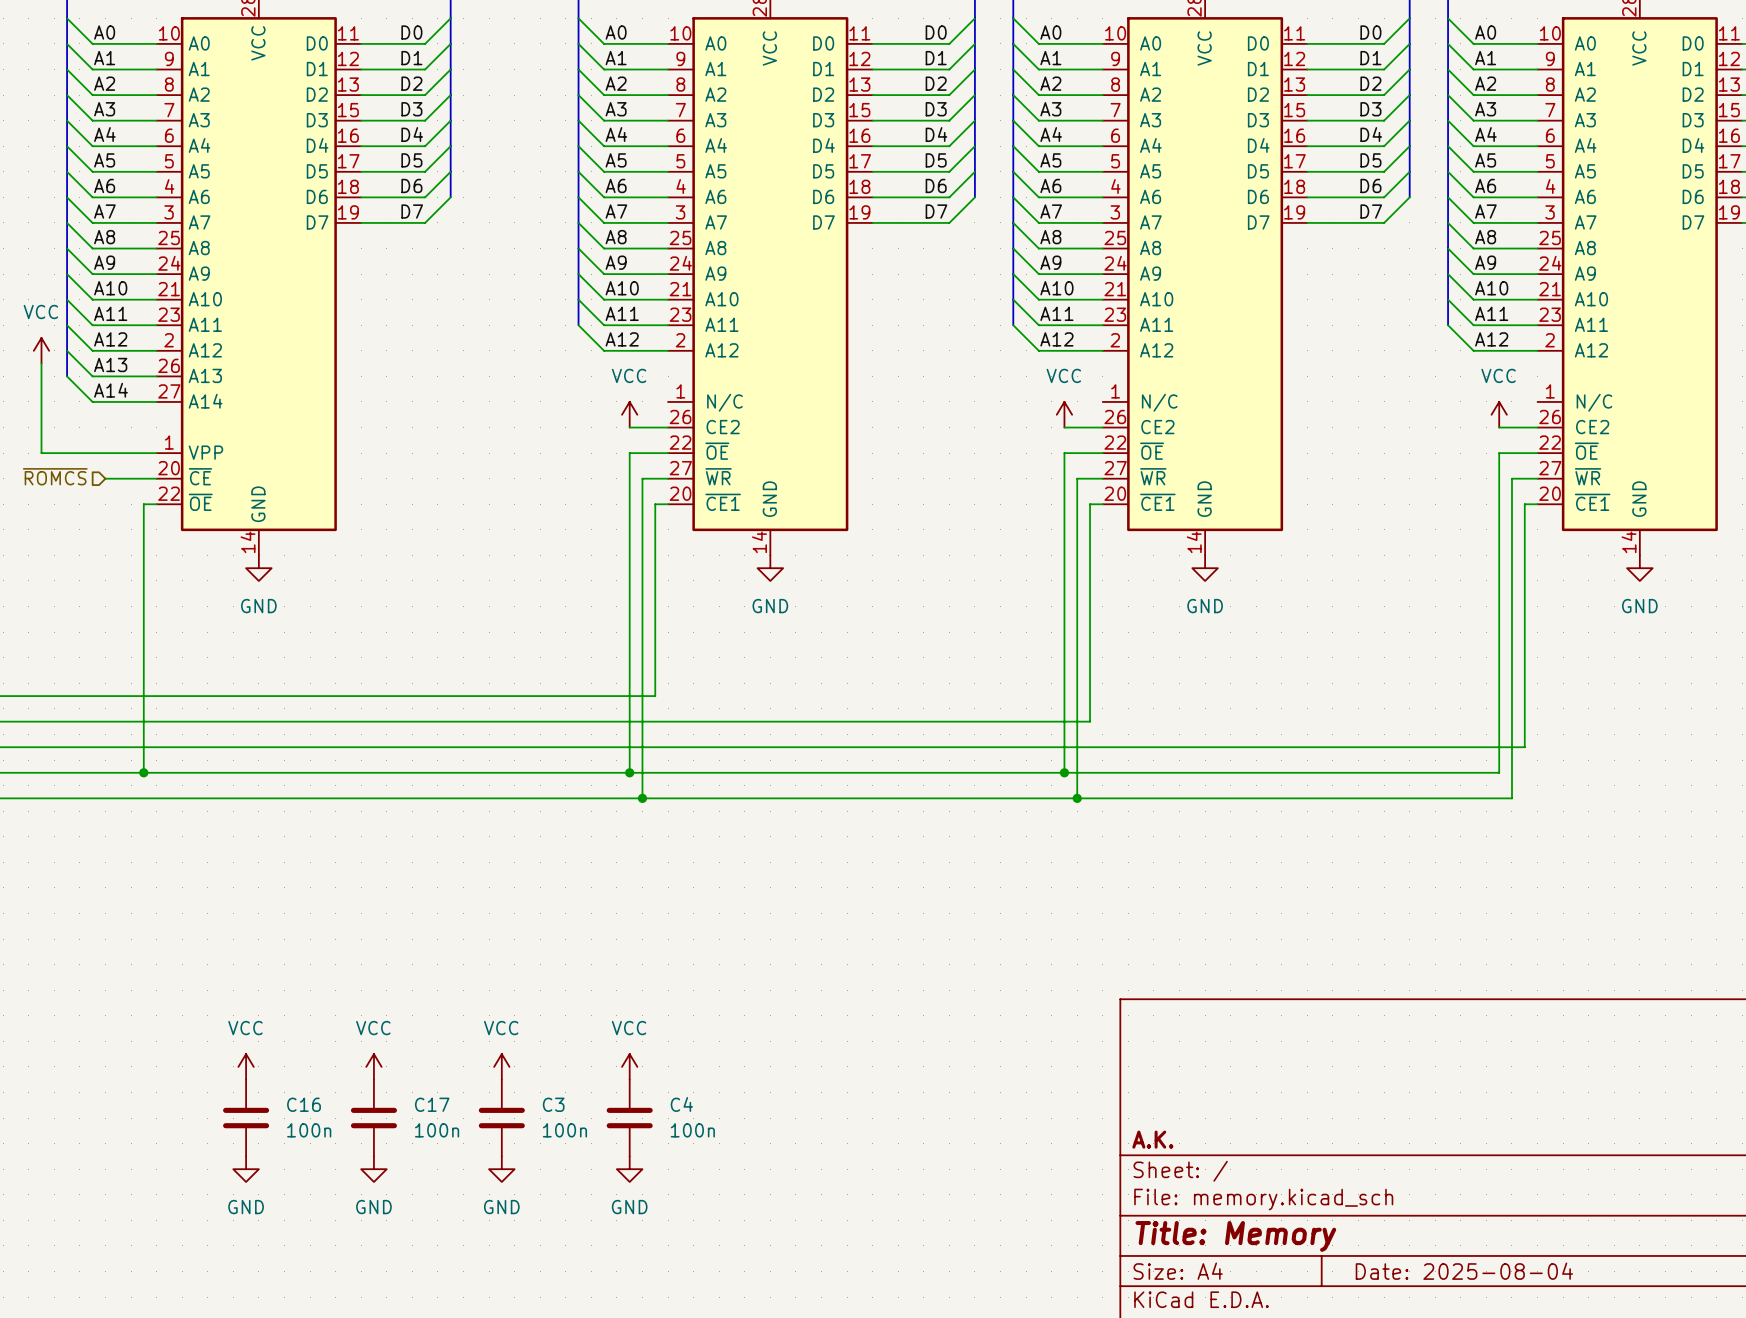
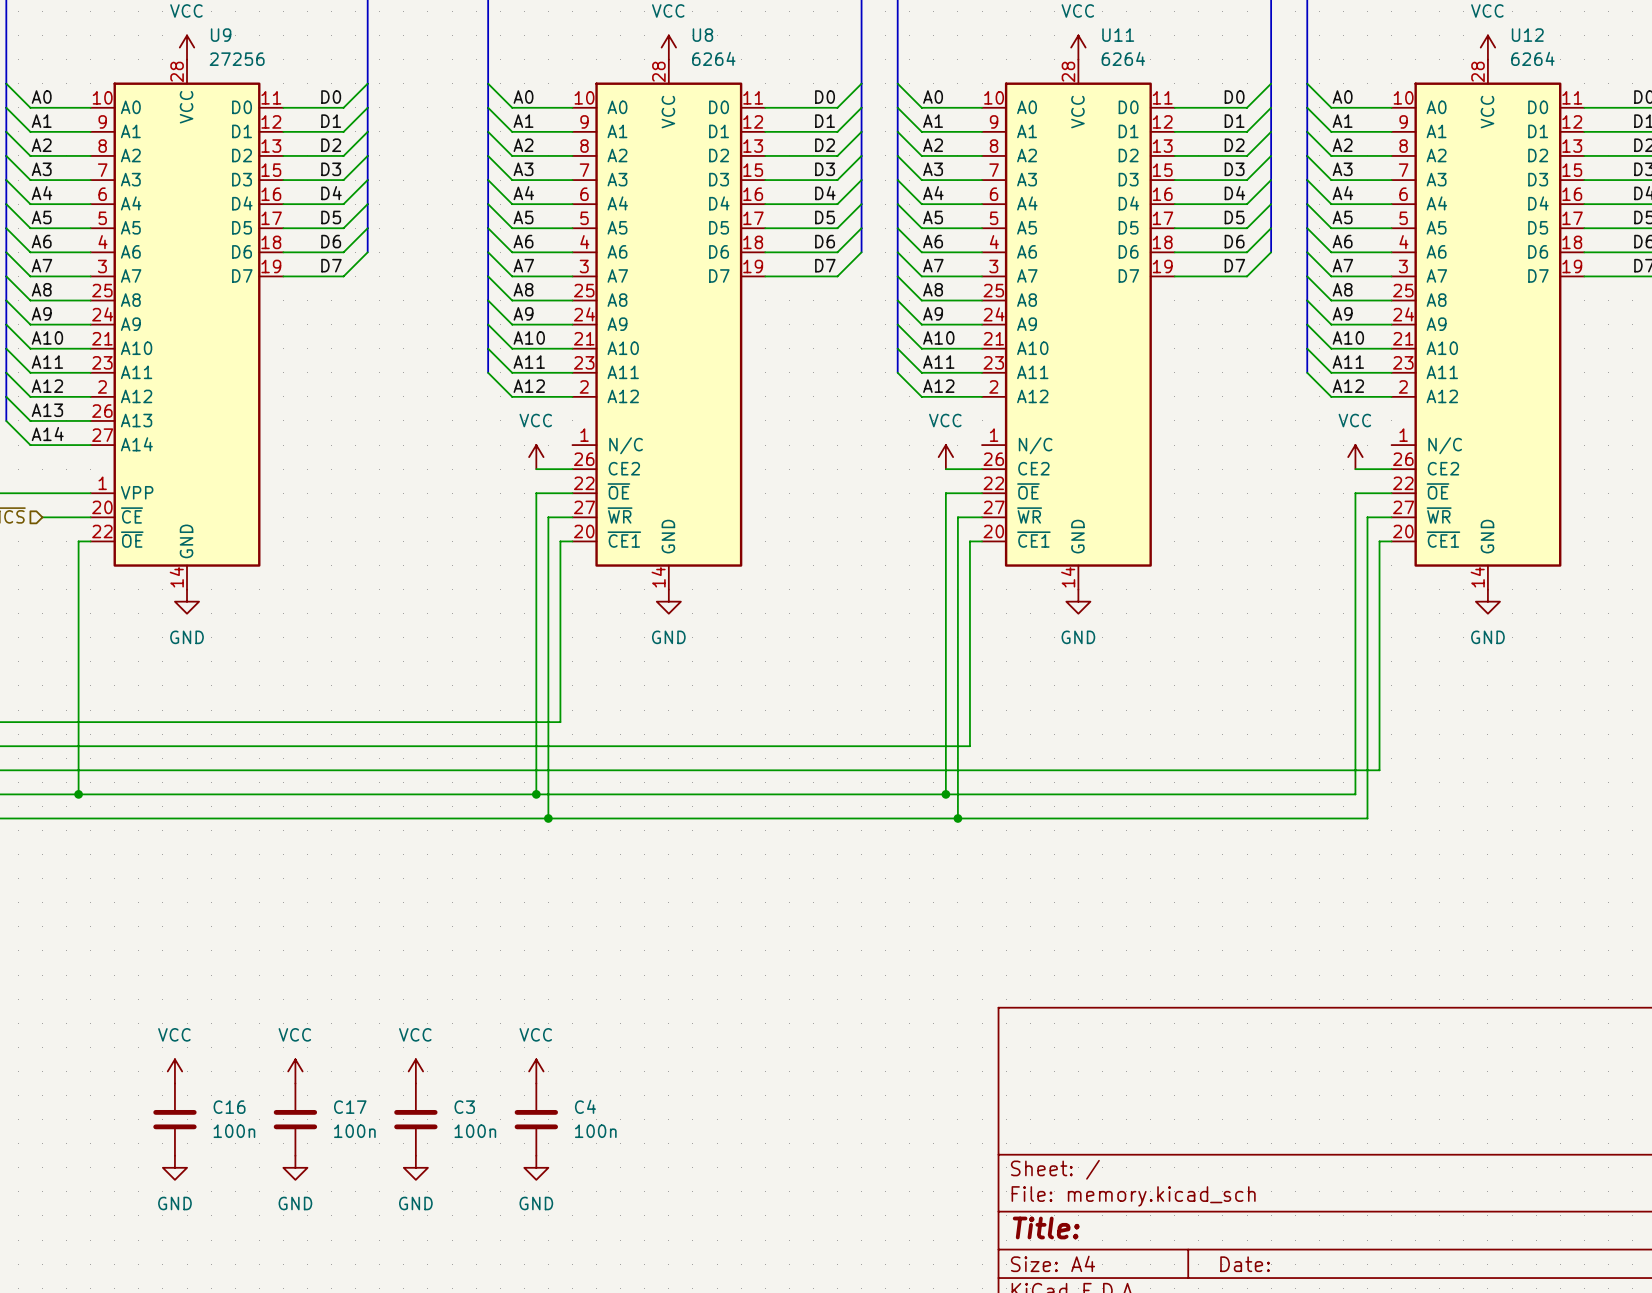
title block: A.K. (1152, 1139) -> none
title block: Title: Memory (1235, 1236) -> Title: (1046, 1227)
title block: Date: 2025-08-04 (1464, 1271) -> Date: (1245, 1264)

